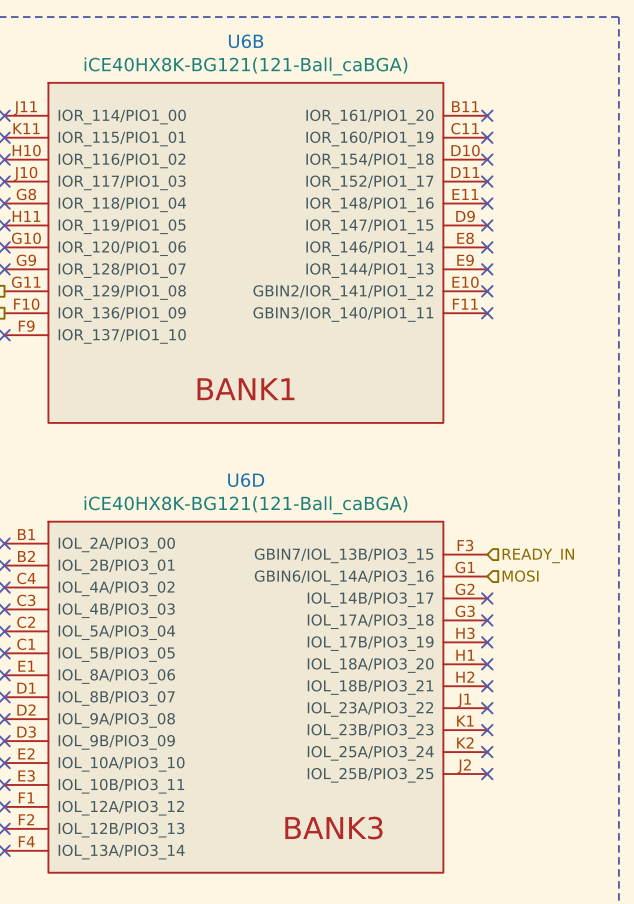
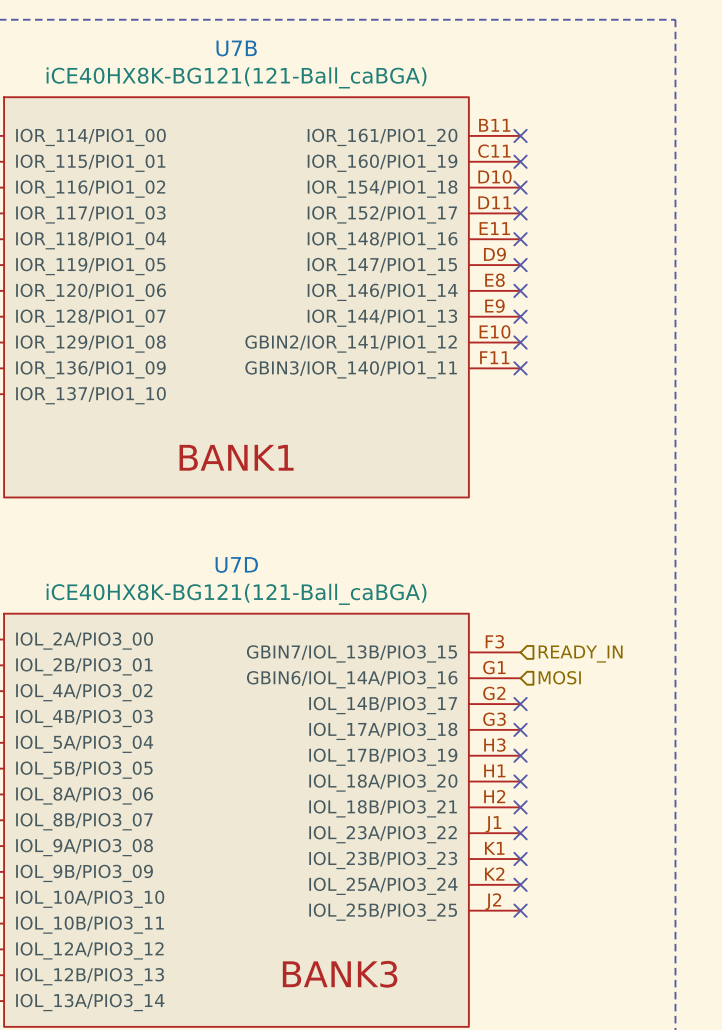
U6B name: U6B (246, 41) -> U7B (236, 48)
U6D name: U6D (246, 480) -> U7D (236, 564)

